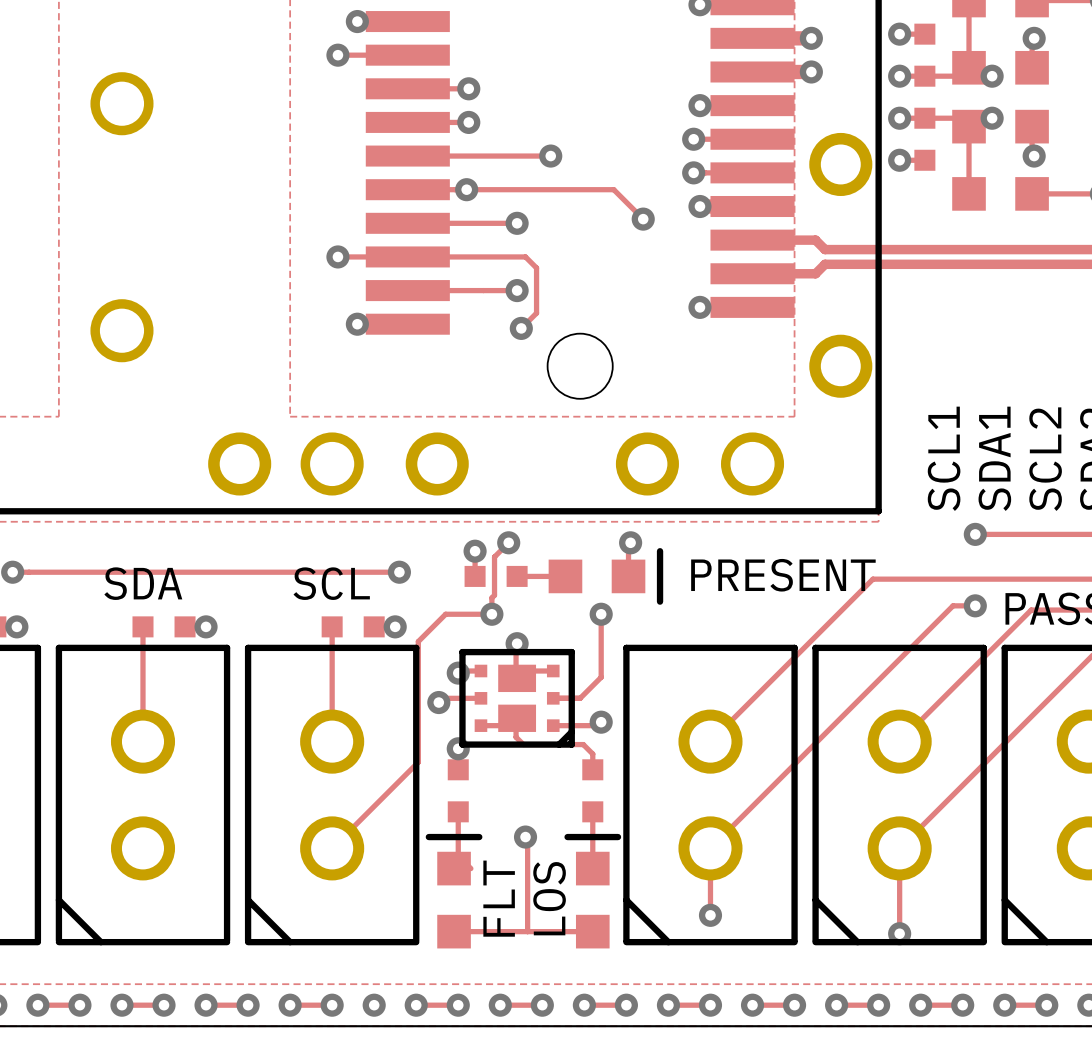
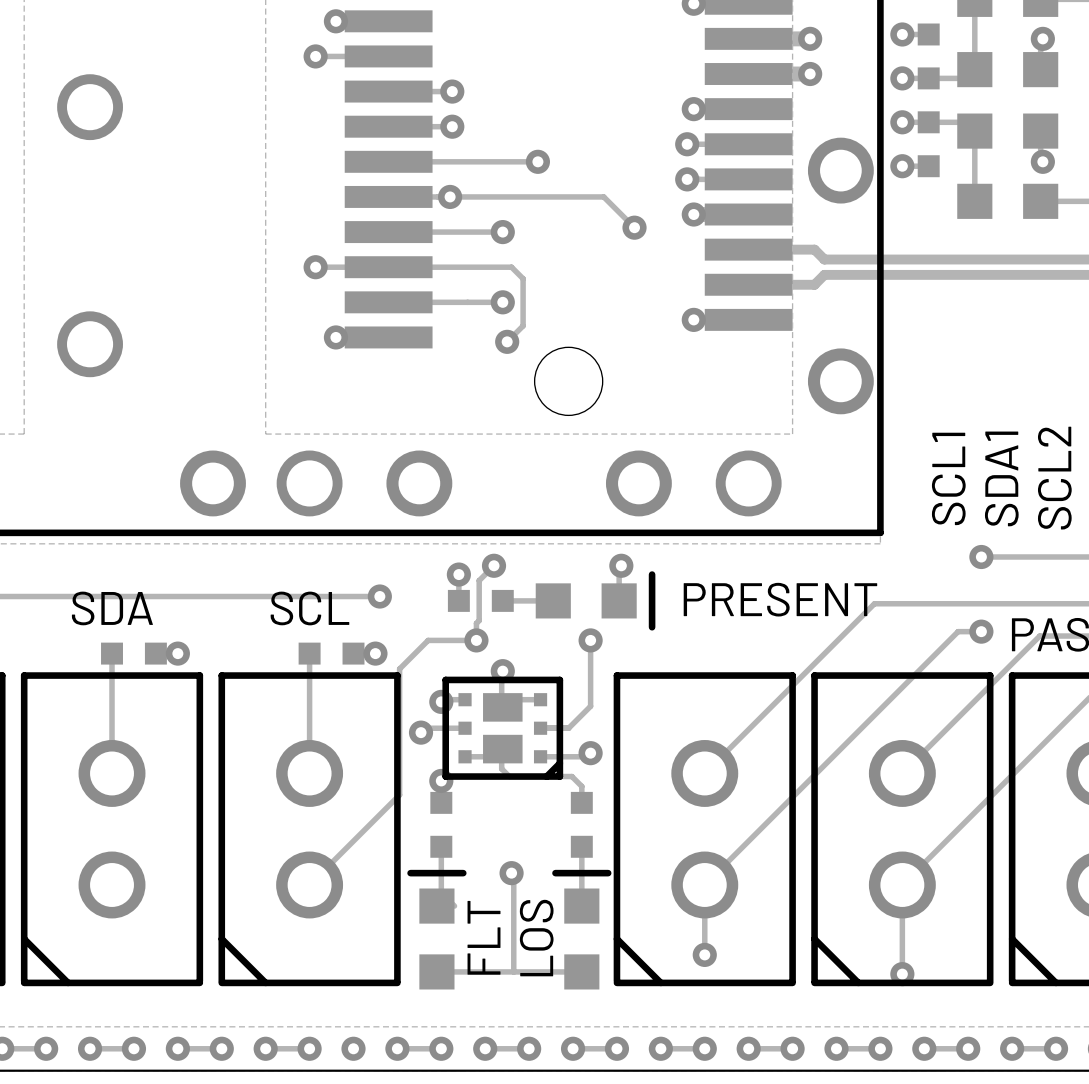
via: (992, 76) -> none
via: (992, 118) -> none

